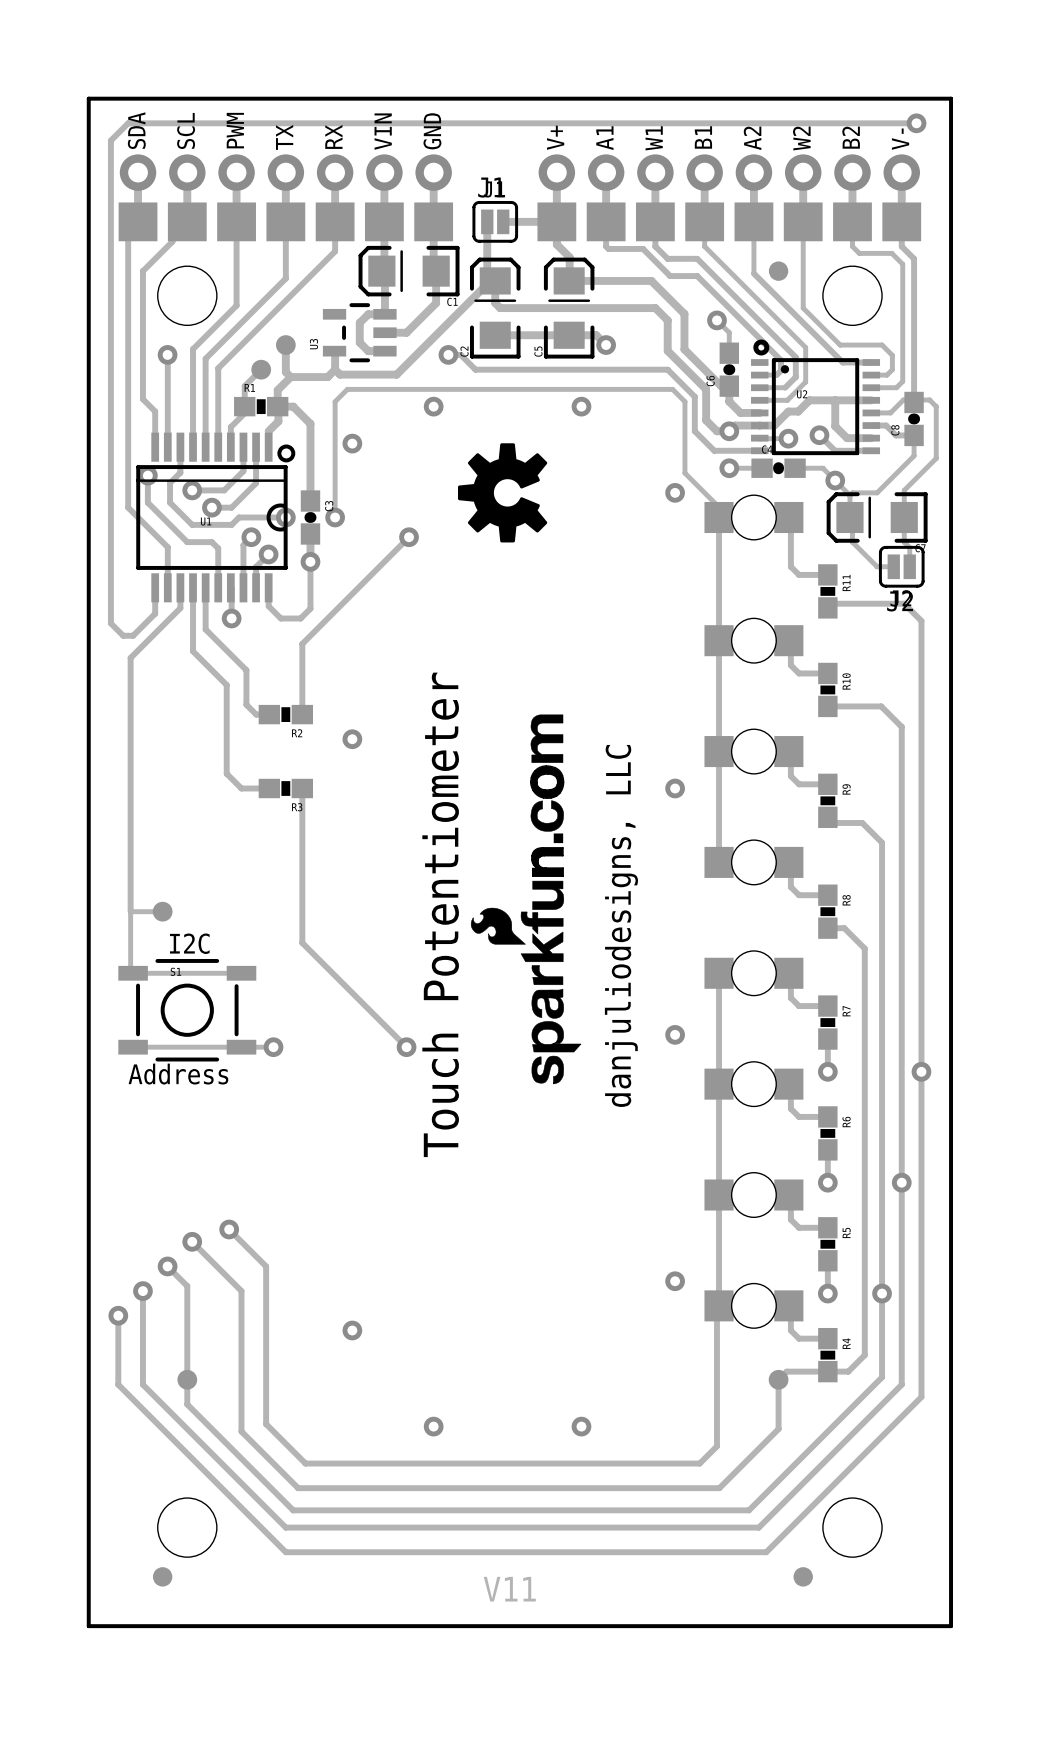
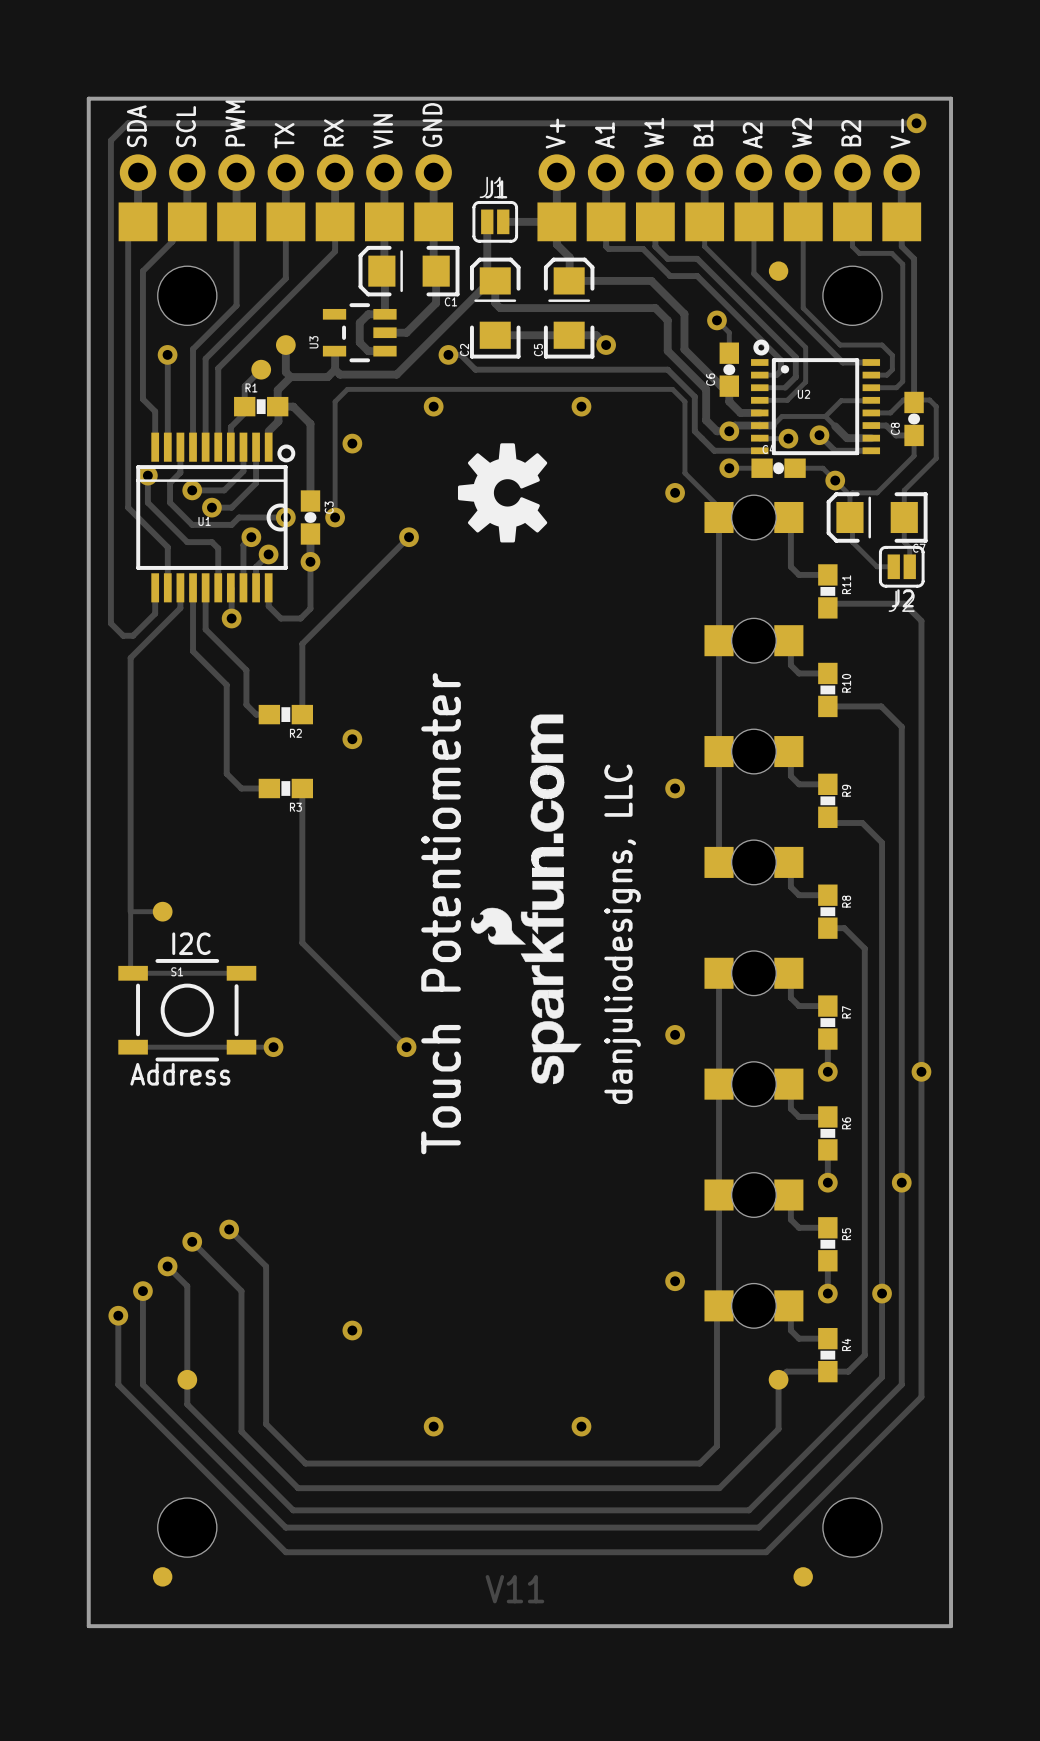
track: (835, 400) (835, 426) -> (825, 416) (835, 426)
track: (871, 400) (809, 400) (798, 411) (788, 411) (772, 425) -> (825, 416) (782, 416) (772, 425)
track: none -> (871, 400) (841, 400) (825, 416)

